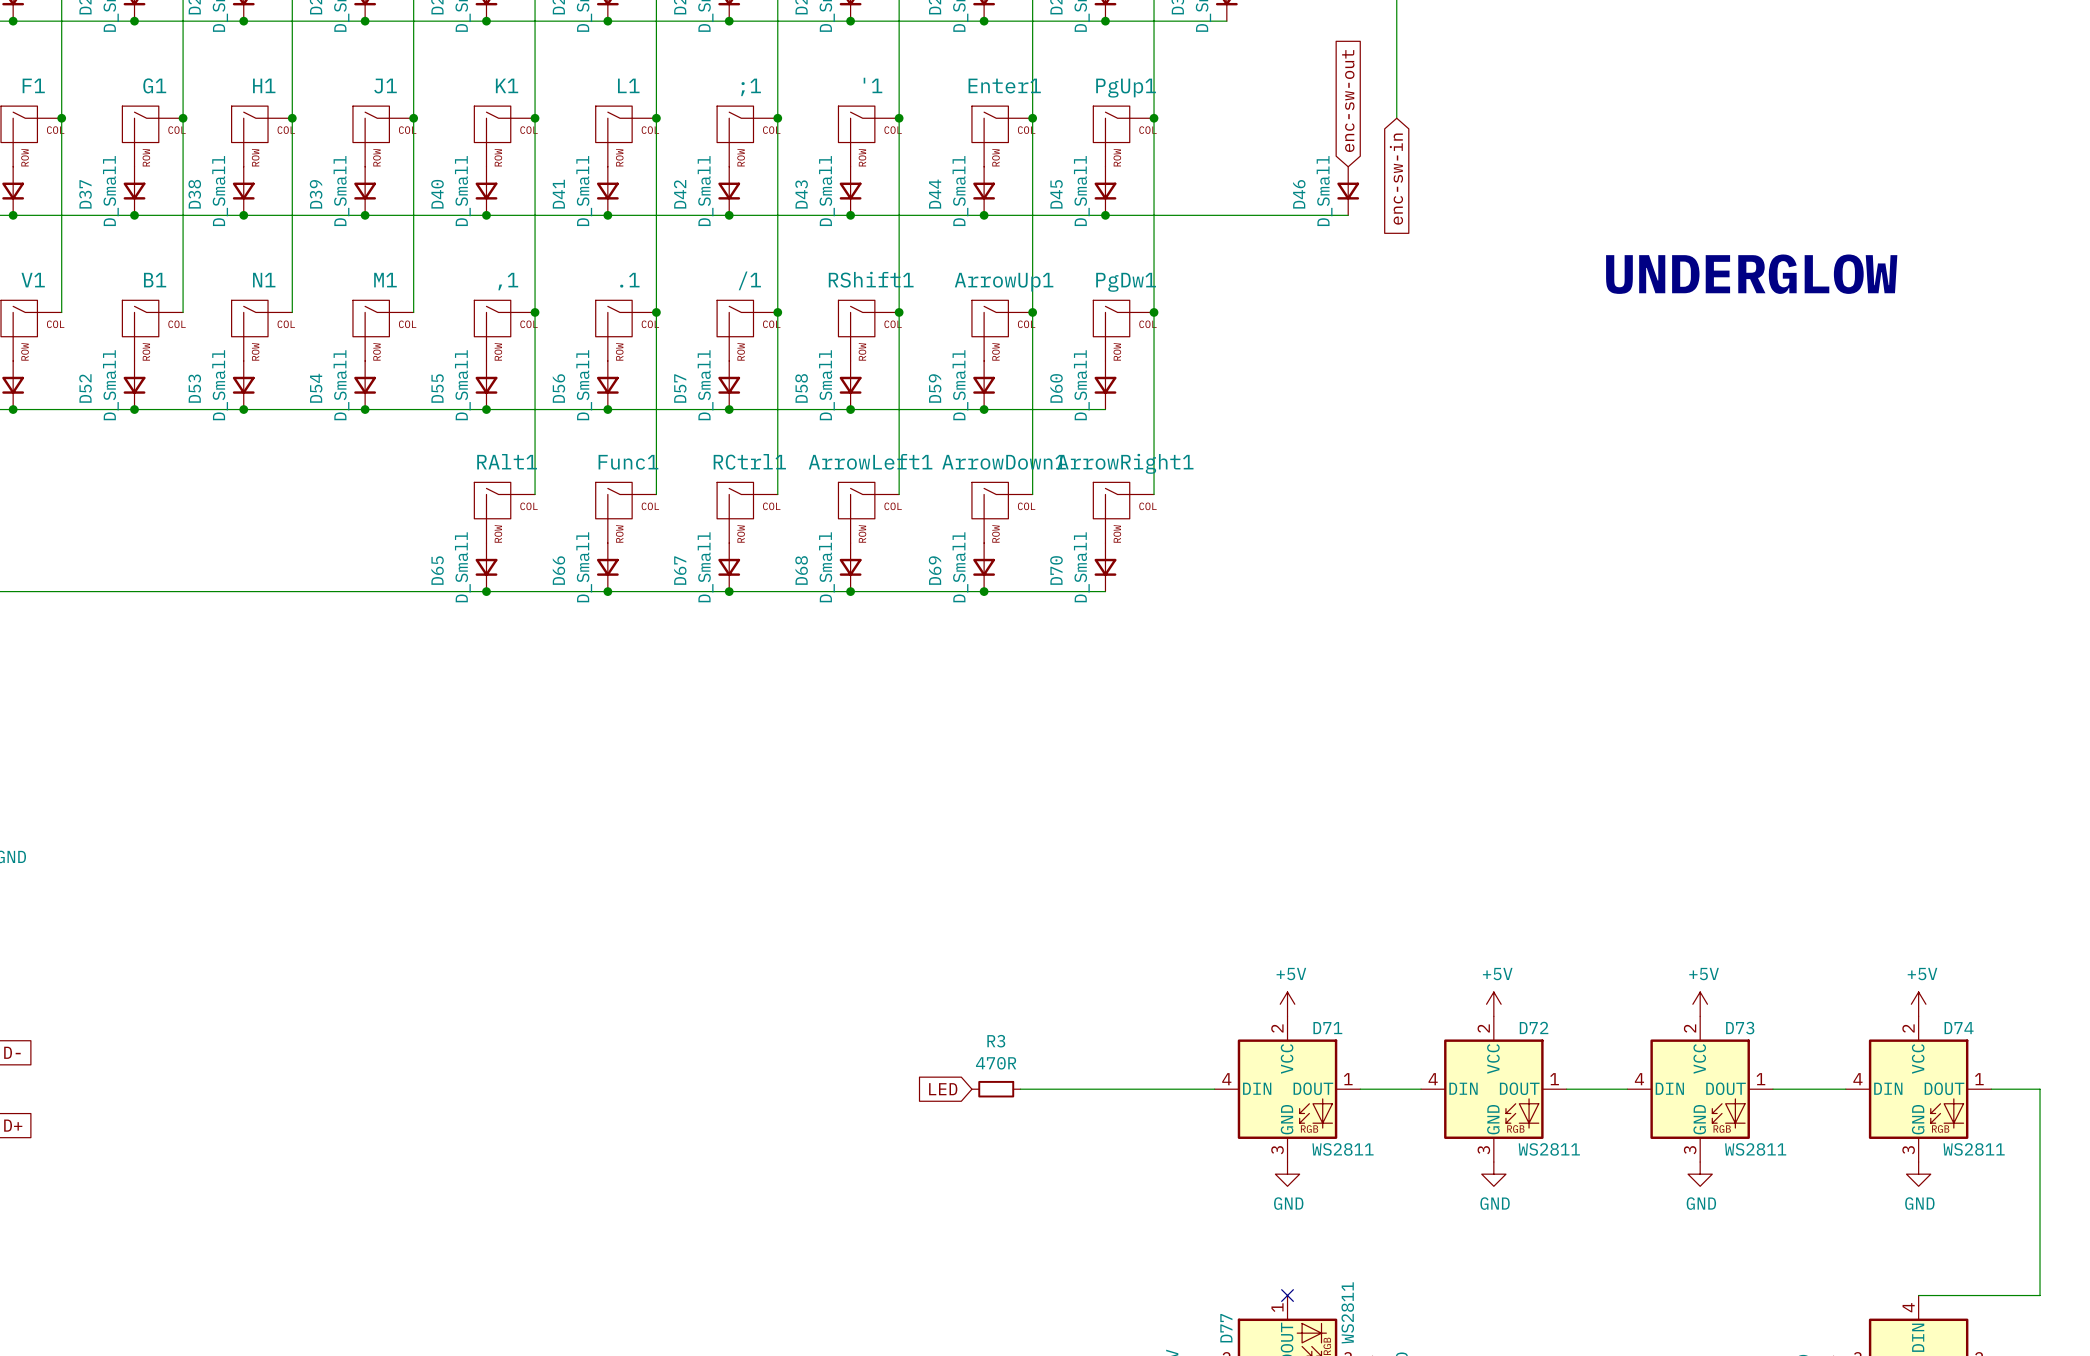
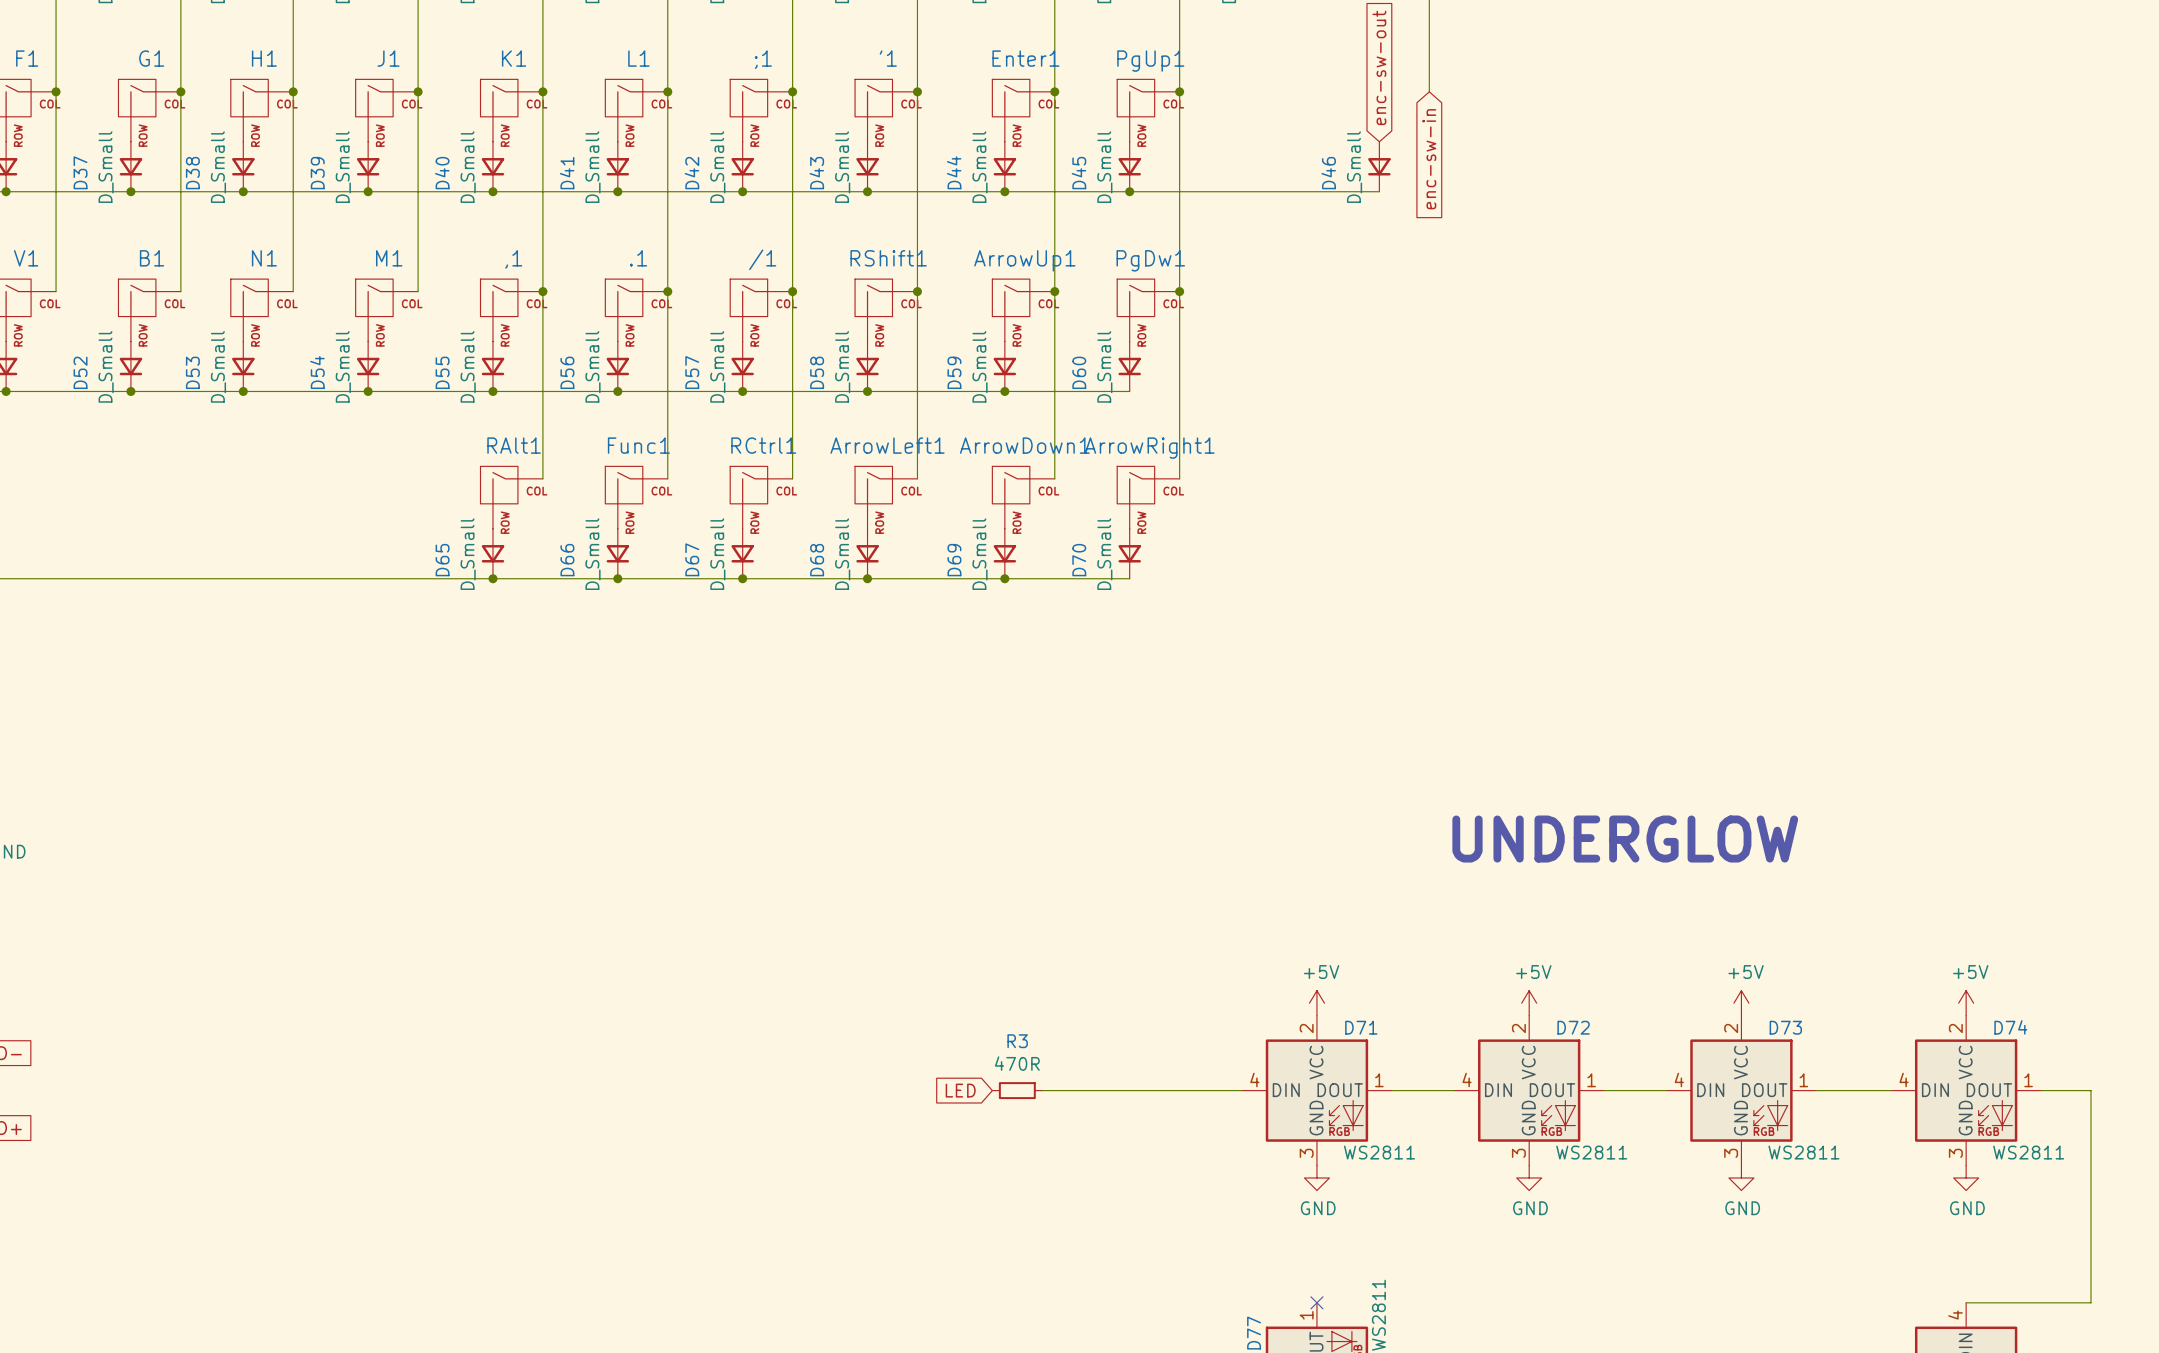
text: UNDERGLOW (1751, 274) -> none
text: none -> UNDERGLOW (1625, 839)

